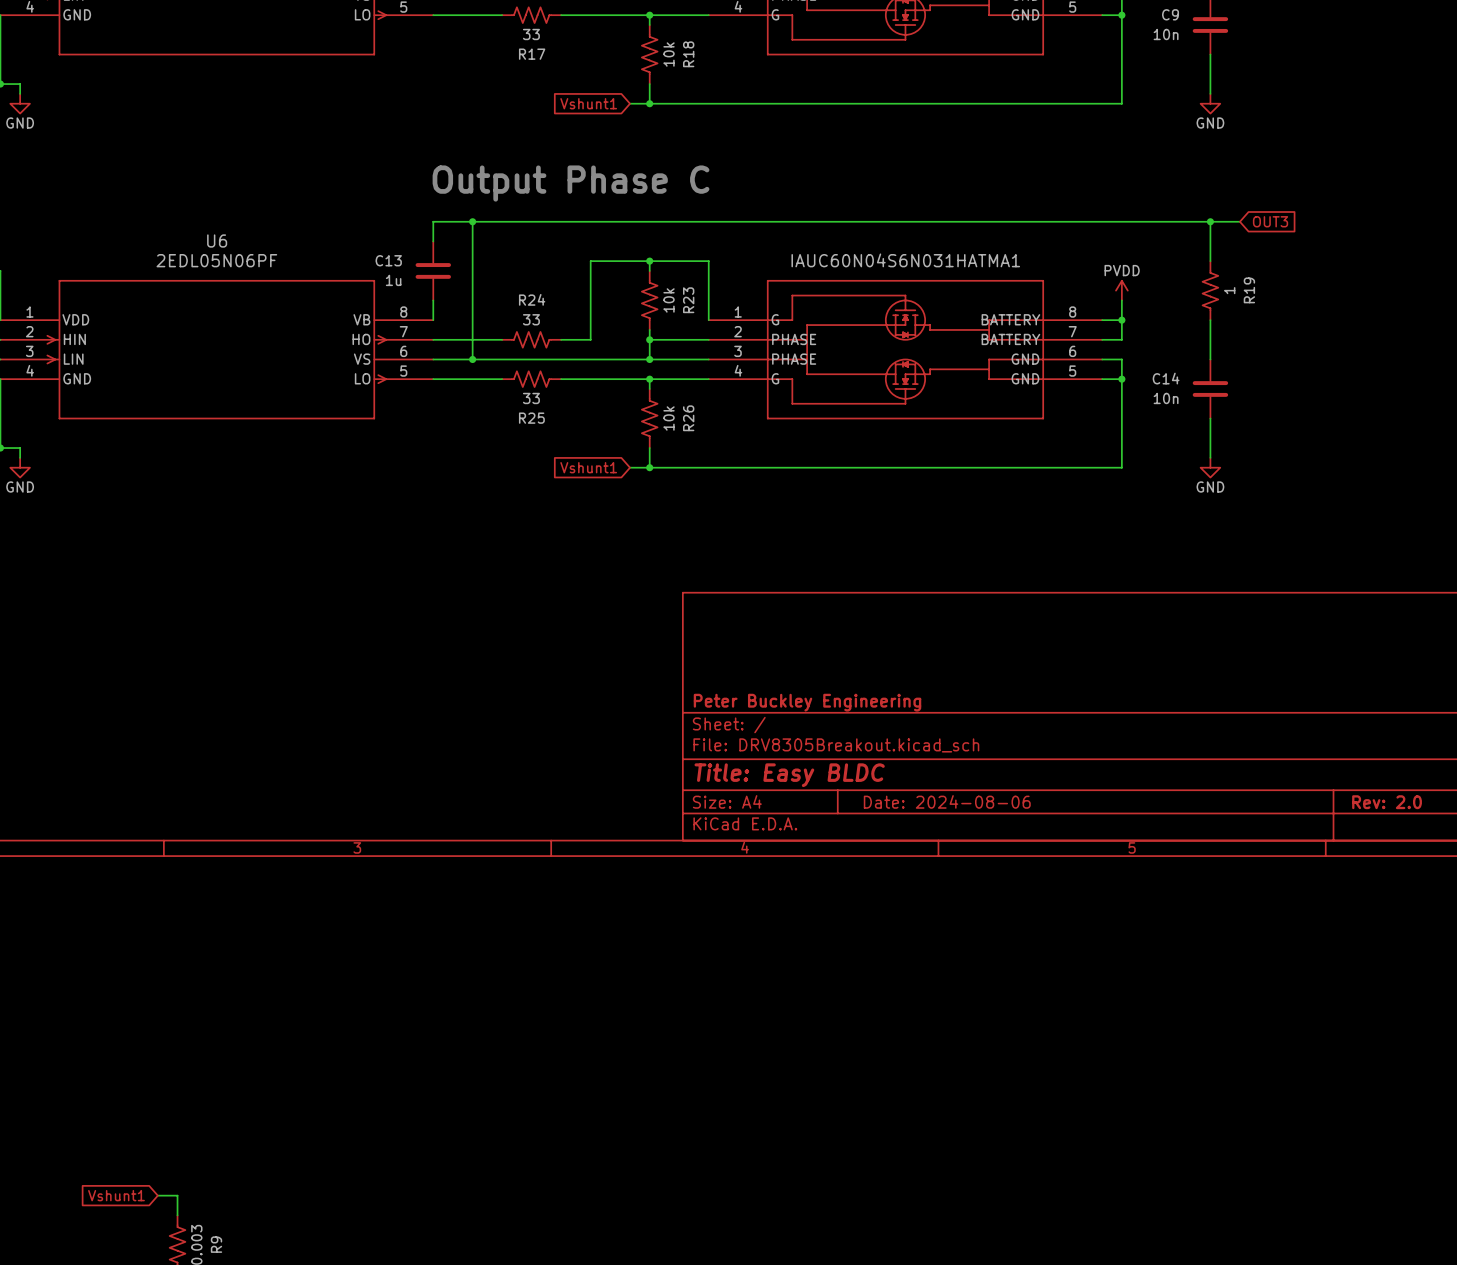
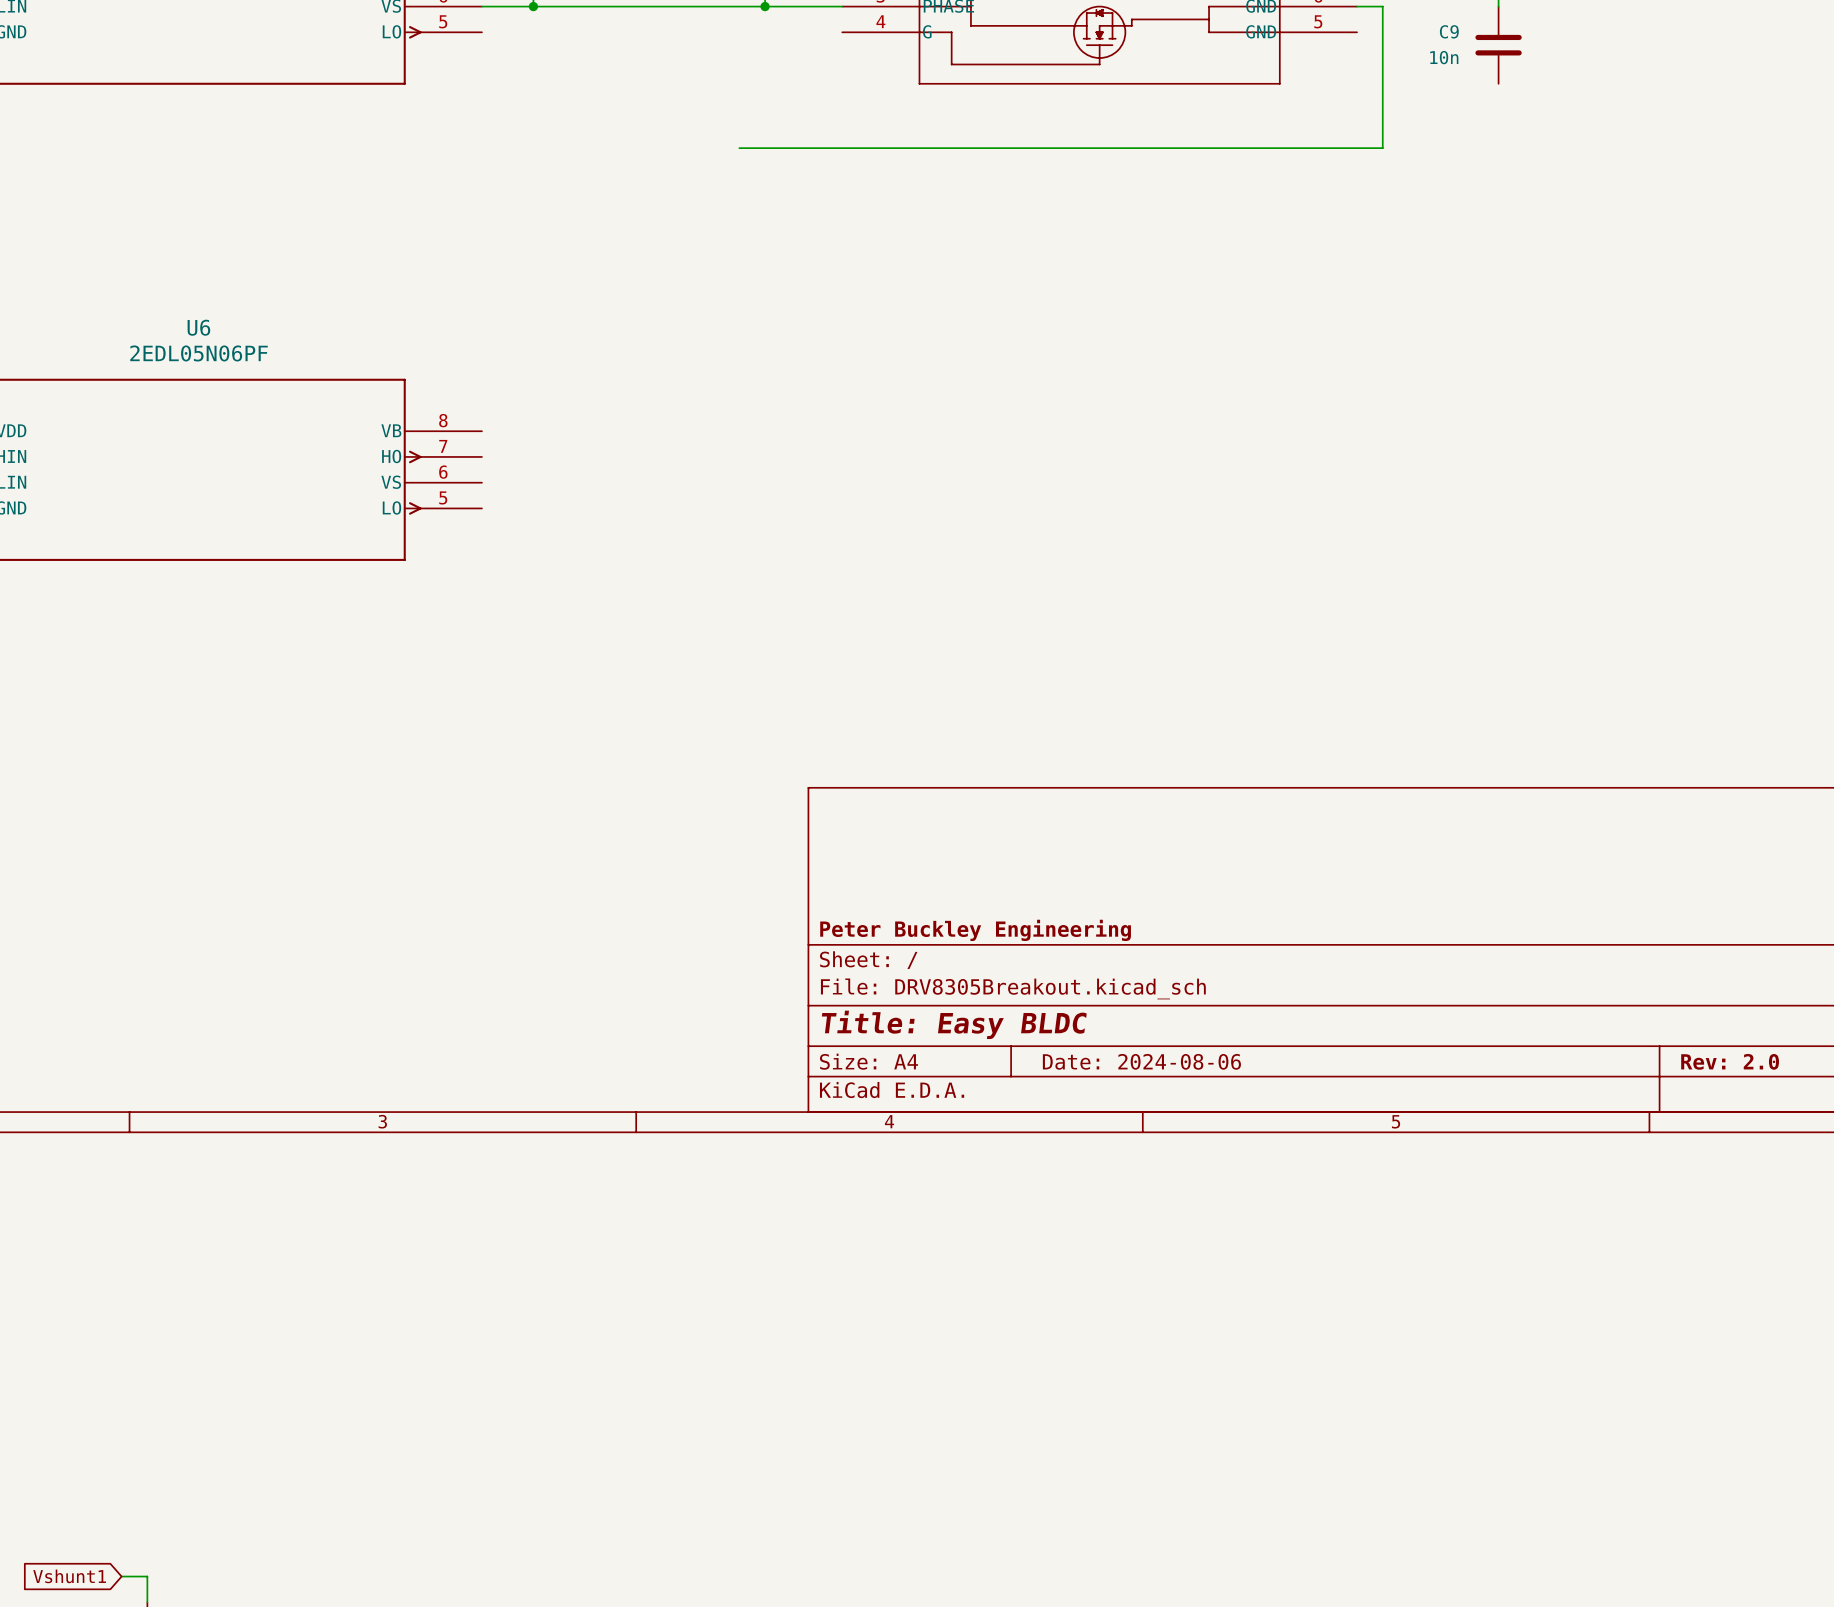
wire: (433, 15) (502, 15) -> none
R17: 33 (531, 15) -> none
wire: (561, 15) (708, 15) -> none
wire: (649, 15) (649, 25) -> none
junction: (649, 15) -> none
wire: (1102, 15) (1121, 15) -> none
junction: (1121, 15) -> none
R18: 10k (649, 54) -> none
wire: (1210, 54) (1210, 93) -> none
wire: (649, 84) (649, 103) -> none
global label: Vshunt1 (588, 103) -> none
junction: (649, 103) -> none
power symbol: GND (1210, 103) -> none
text: Output Phase C (571, 183) -> none
wire: (472, 221) (472, 359) -> none
junction: (472, 221) -> none
wire: (1210, 221) (1210, 261) -> none
junction: (1210, 221) -> none
wire: (1239, 221) (433, 221) (433, 241) -> none
global label: OUT3 (1270, 221) -> none
wire: (649, 261) (649, 270) -> none
junction: (649, 261) -> none
C13: 1u (433, 270) -> none
power symbol: PVDD (1121, 290) -> none
R19: 1 (1210, 290) -> none
wire: (433, 300) (433, 320) -> none
R23: 10k (649, 300) -> none
wire: (1121, 300) (1121, 339) (1102, 339) -> none
wire: (708, 320) (708, 261) (590, 261) (590, 339) (561, 339) -> none
wire: (1102, 320) (1121, 320) -> none
junction: (1121, 320) -> none
wire: (1210, 320) (1210, 359) -> none
wire: (649, 329) (649, 359) -> none
wire: (433, 339) (502, 339) -> none
R24: 33 (531, 339) -> none
wire: (649, 339) (708, 339) -> none
junction: (649, 339) -> none
part: IAUC60N04S6N031HATMA1 (905, 349) -> none
wire: (433, 359) (708, 359) -> none
junction: (472, 359) -> none
junction: (649, 359) -> none
wire: (1102, 359) (1121, 359) (1121, 467) (630, 467) -> none
wire: (433, 379) (502, 379) -> none
R25: 33 (531, 379) -> none
wire: (561, 379) (708, 379) -> none
wire: (649, 379) (649, 389) -> none
junction: (649, 379) -> none
wire: (1102, 379) (1121, 379) -> none
junction: (1121, 379) -> none
C14: 10n (1210, 389) -> none
R26: 10k (649, 418) -> none
wire: (1210, 418) (1210, 457) -> none
wire: (649, 448) (649, 467) -> none
global label: Vshunt1 (588, 467) -> none
junction: (649, 467) -> none
power symbol: GND (1210, 467) -> none

